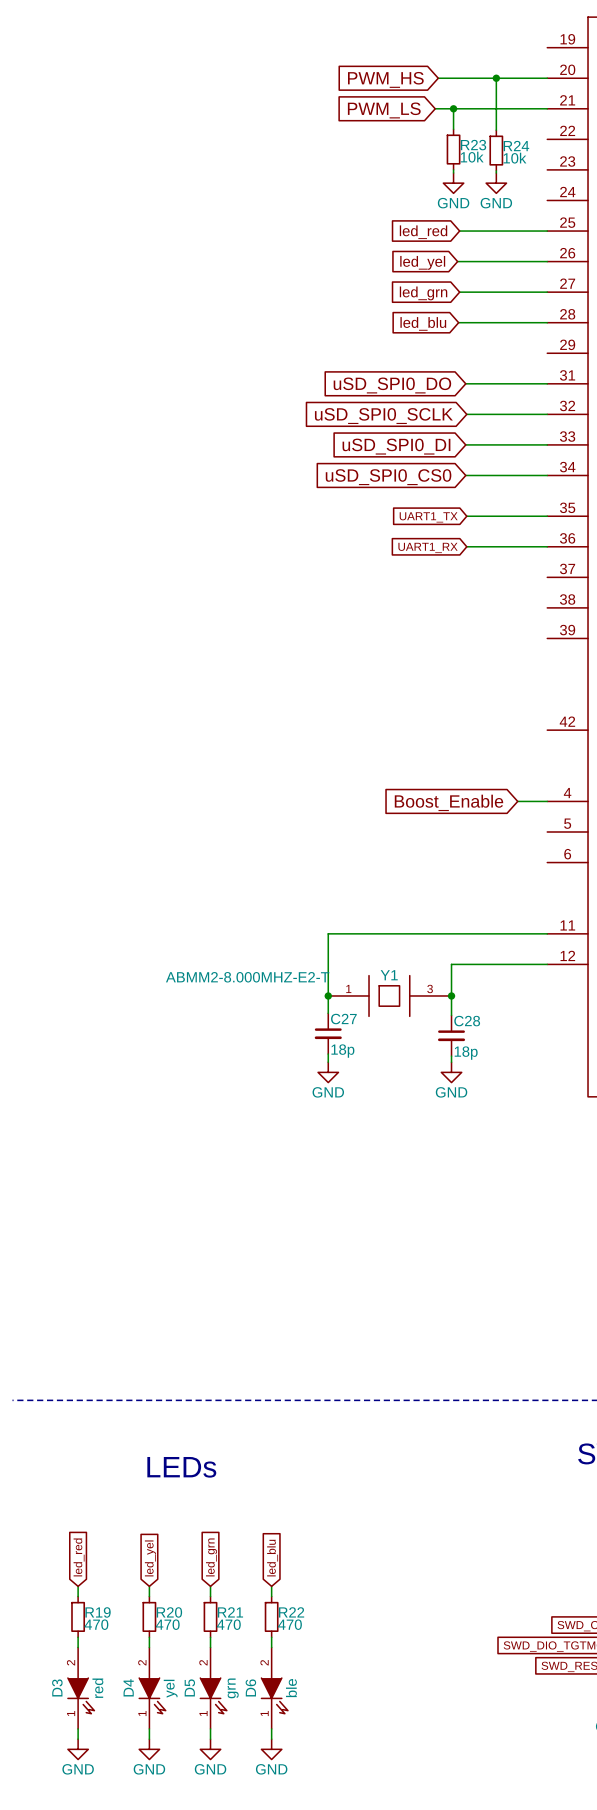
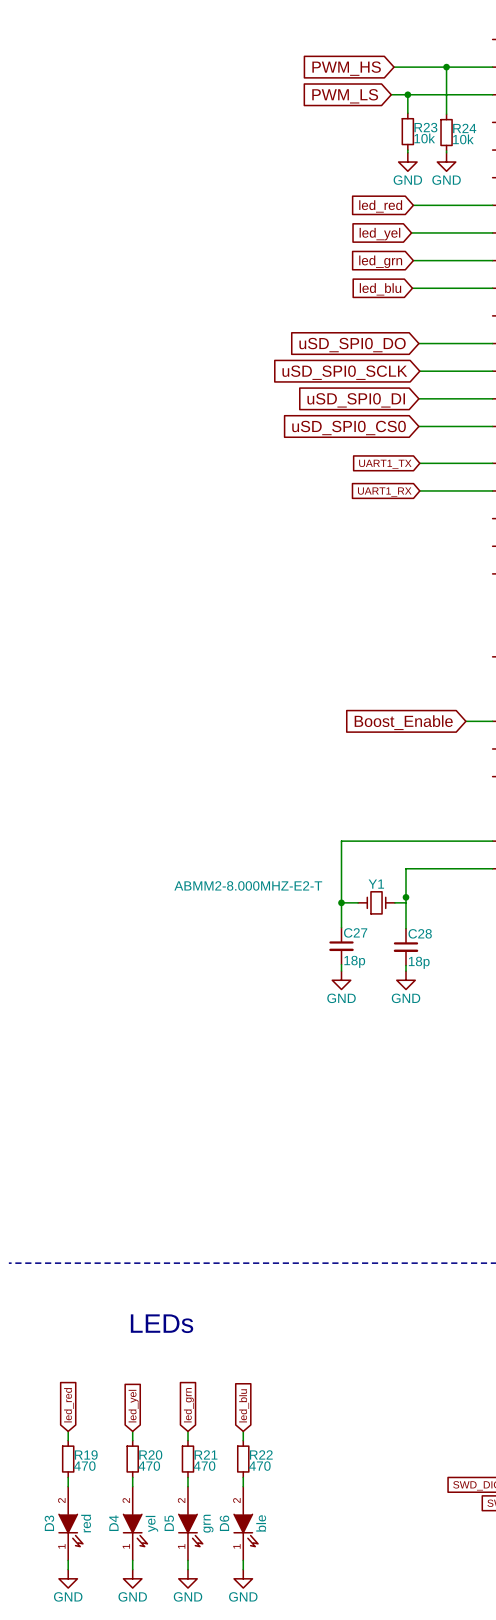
wire: (380, 933) (328, 933) (328, 1013) -> (341, 841) (341, 927)
Y1 symbol: [328, 975, 451, 1017] -> [358, 891, 395, 914]
junction: (328, 995) -> none
wire: none -> (341, 902) (358, 902)
junction: none -> (341, 902)
wire: none -> (394, 902) (406, 902)
C27 position: (328, 1033) -> (341, 946)
C28 position: (451, 1035) -> (406, 947)
wire: (328, 1054) (328, 1062) -> none
wire: none -> (341, 964) (341, 971)
power symbol: GND (328, 1072) -> none
power symbol position: GND (451, 1072) -> GND (406, 980)
power symbol: none -> GND (341, 980)

